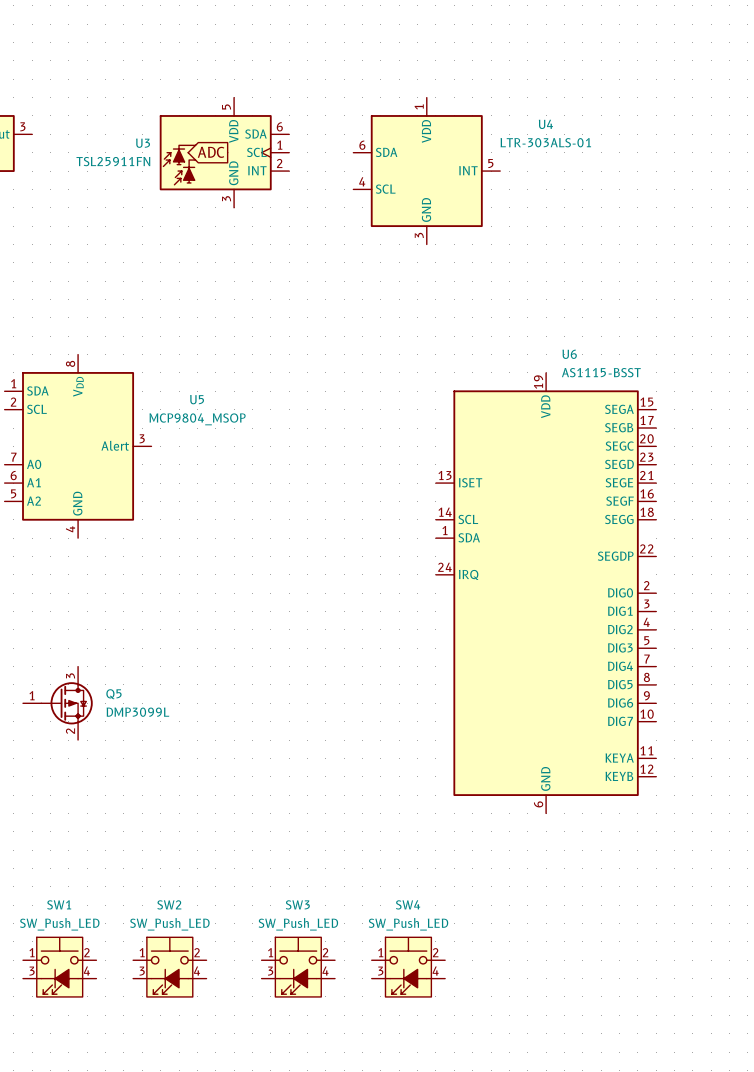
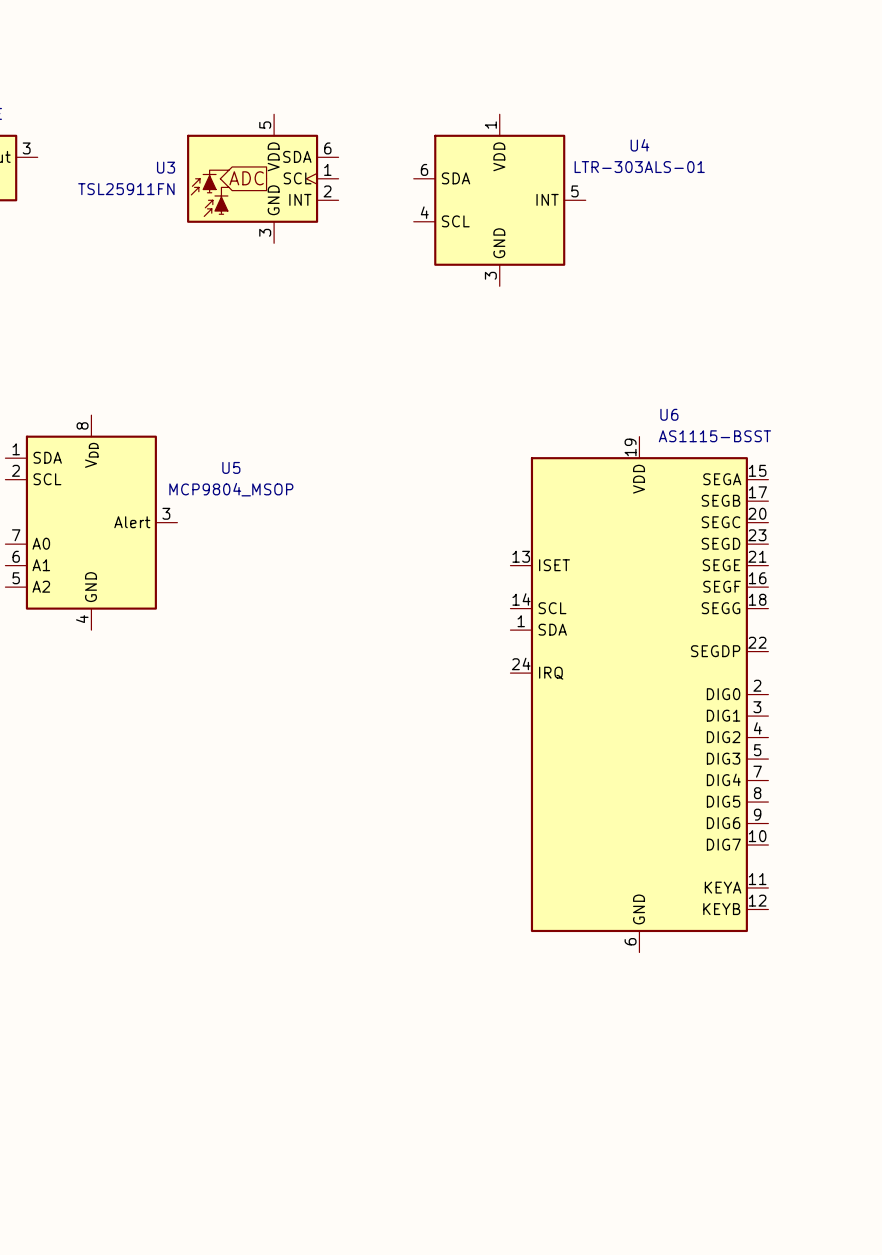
Q5: DMP3099L (57, 703) -> none
SW1: SW_Push_LED (59, 967) -> none
SW2: SW_Push_LED (169, 967) -> none
SW3: SW_Push_LED (298, 967) -> none
SW4: SW_Push_LED (408, 967) -> none

